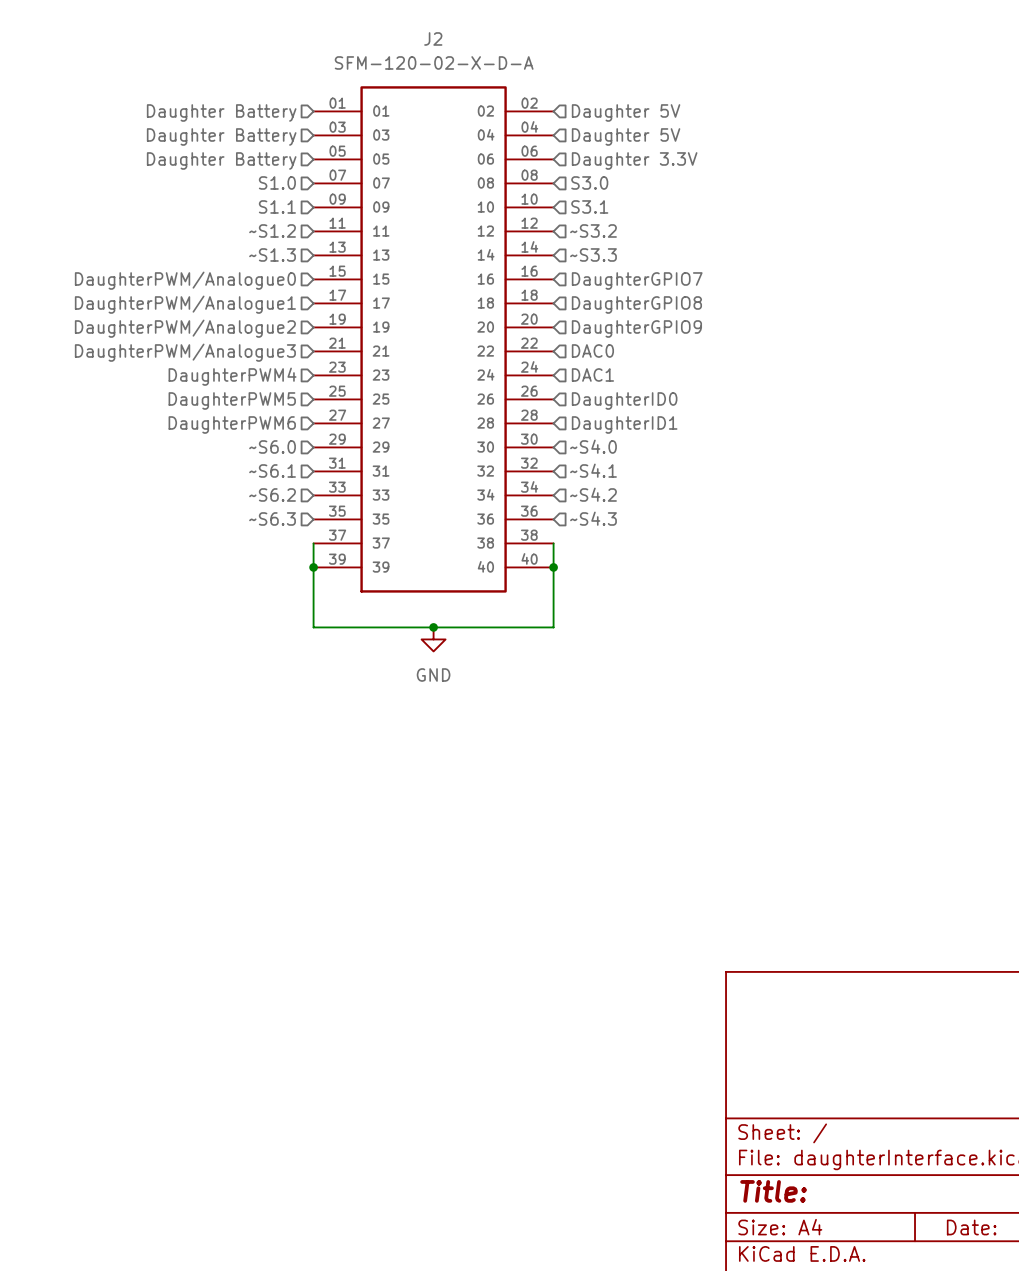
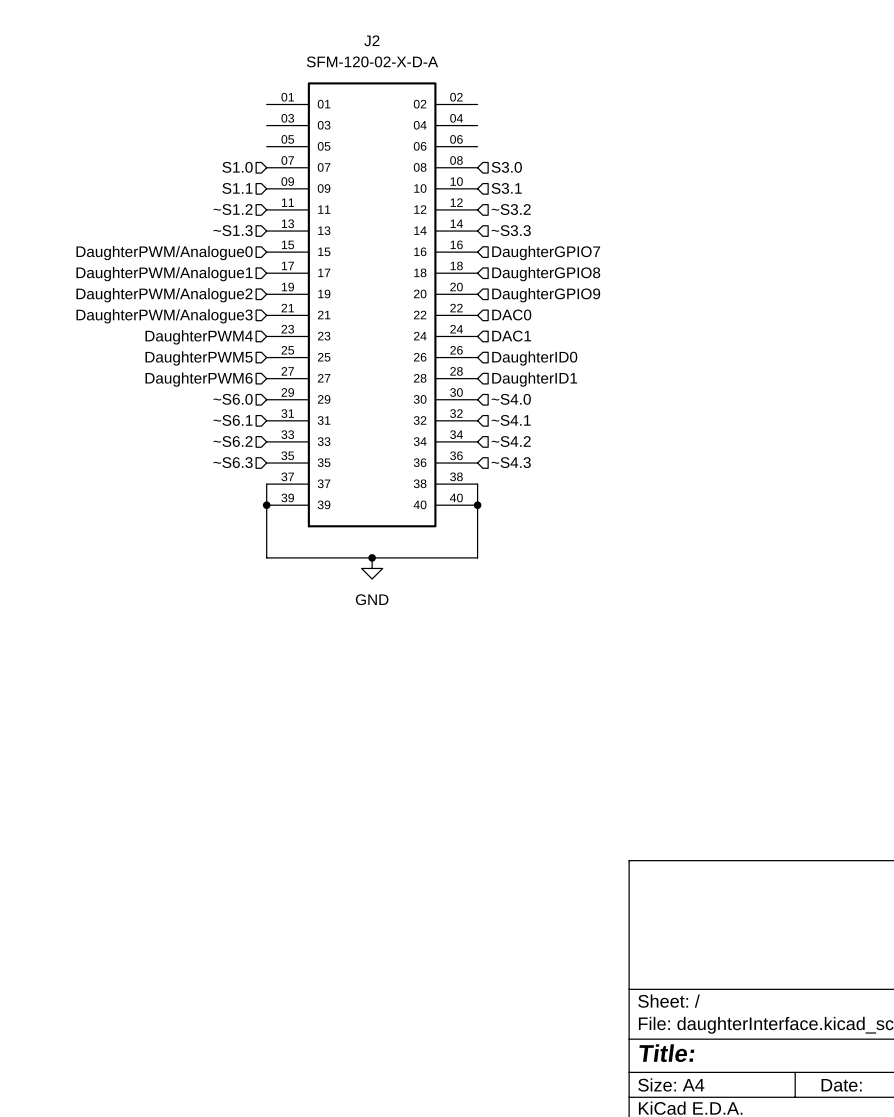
hierarchical label: Daughter Battery (221, 112) -> none
hierarchical label: Daughter 5V (626, 112) -> none
hierarchical label: Daughter Battery (221, 136) -> none
hierarchical label: Daughter 5V (626, 136) -> none
hierarchical label: Daughter Battery (221, 160) -> none
hierarchical label: Daughter 3.3V (634, 160) -> none

